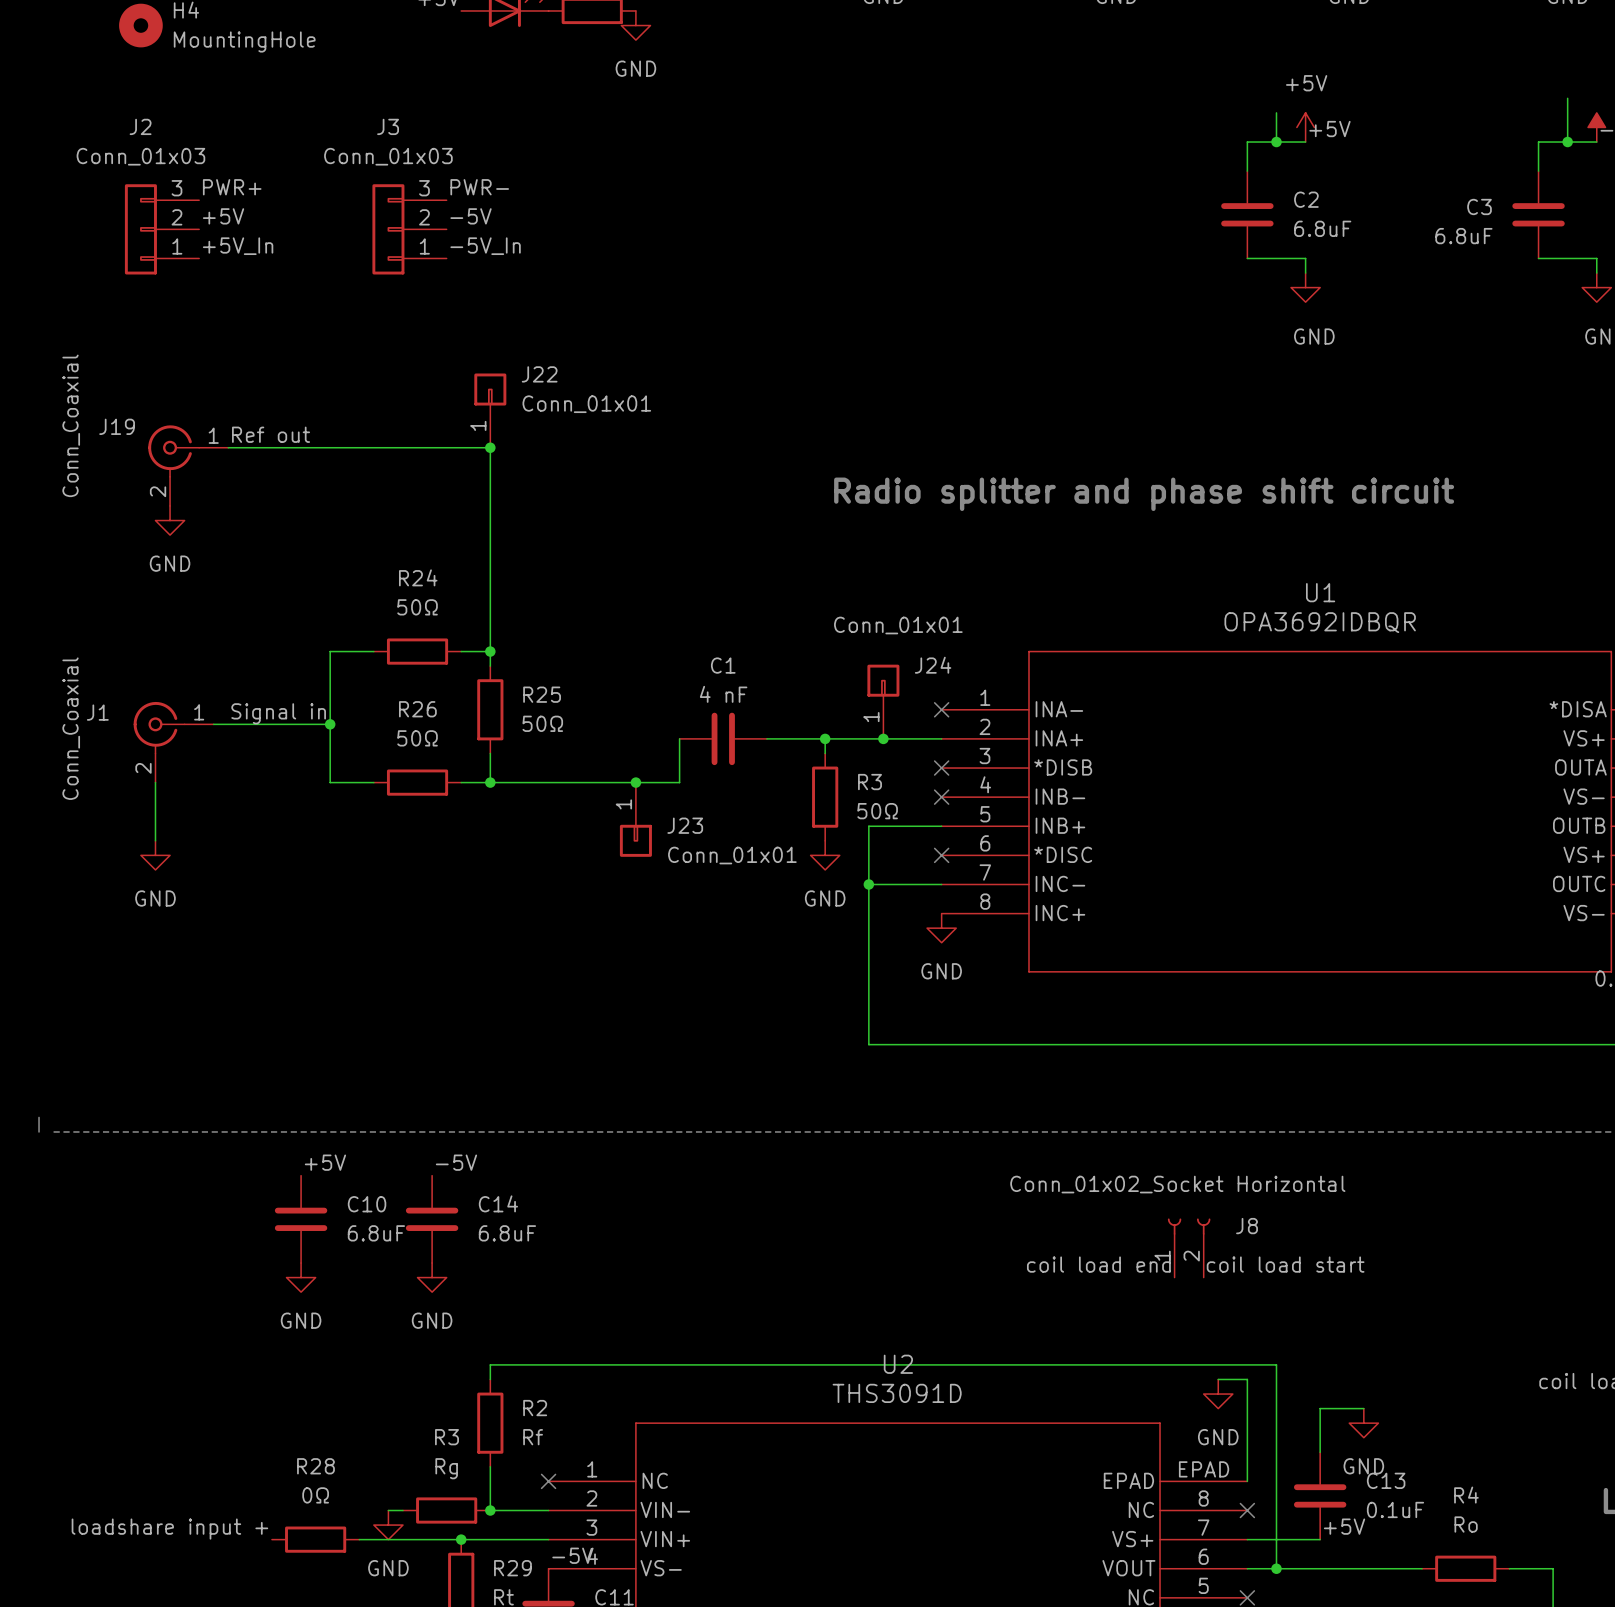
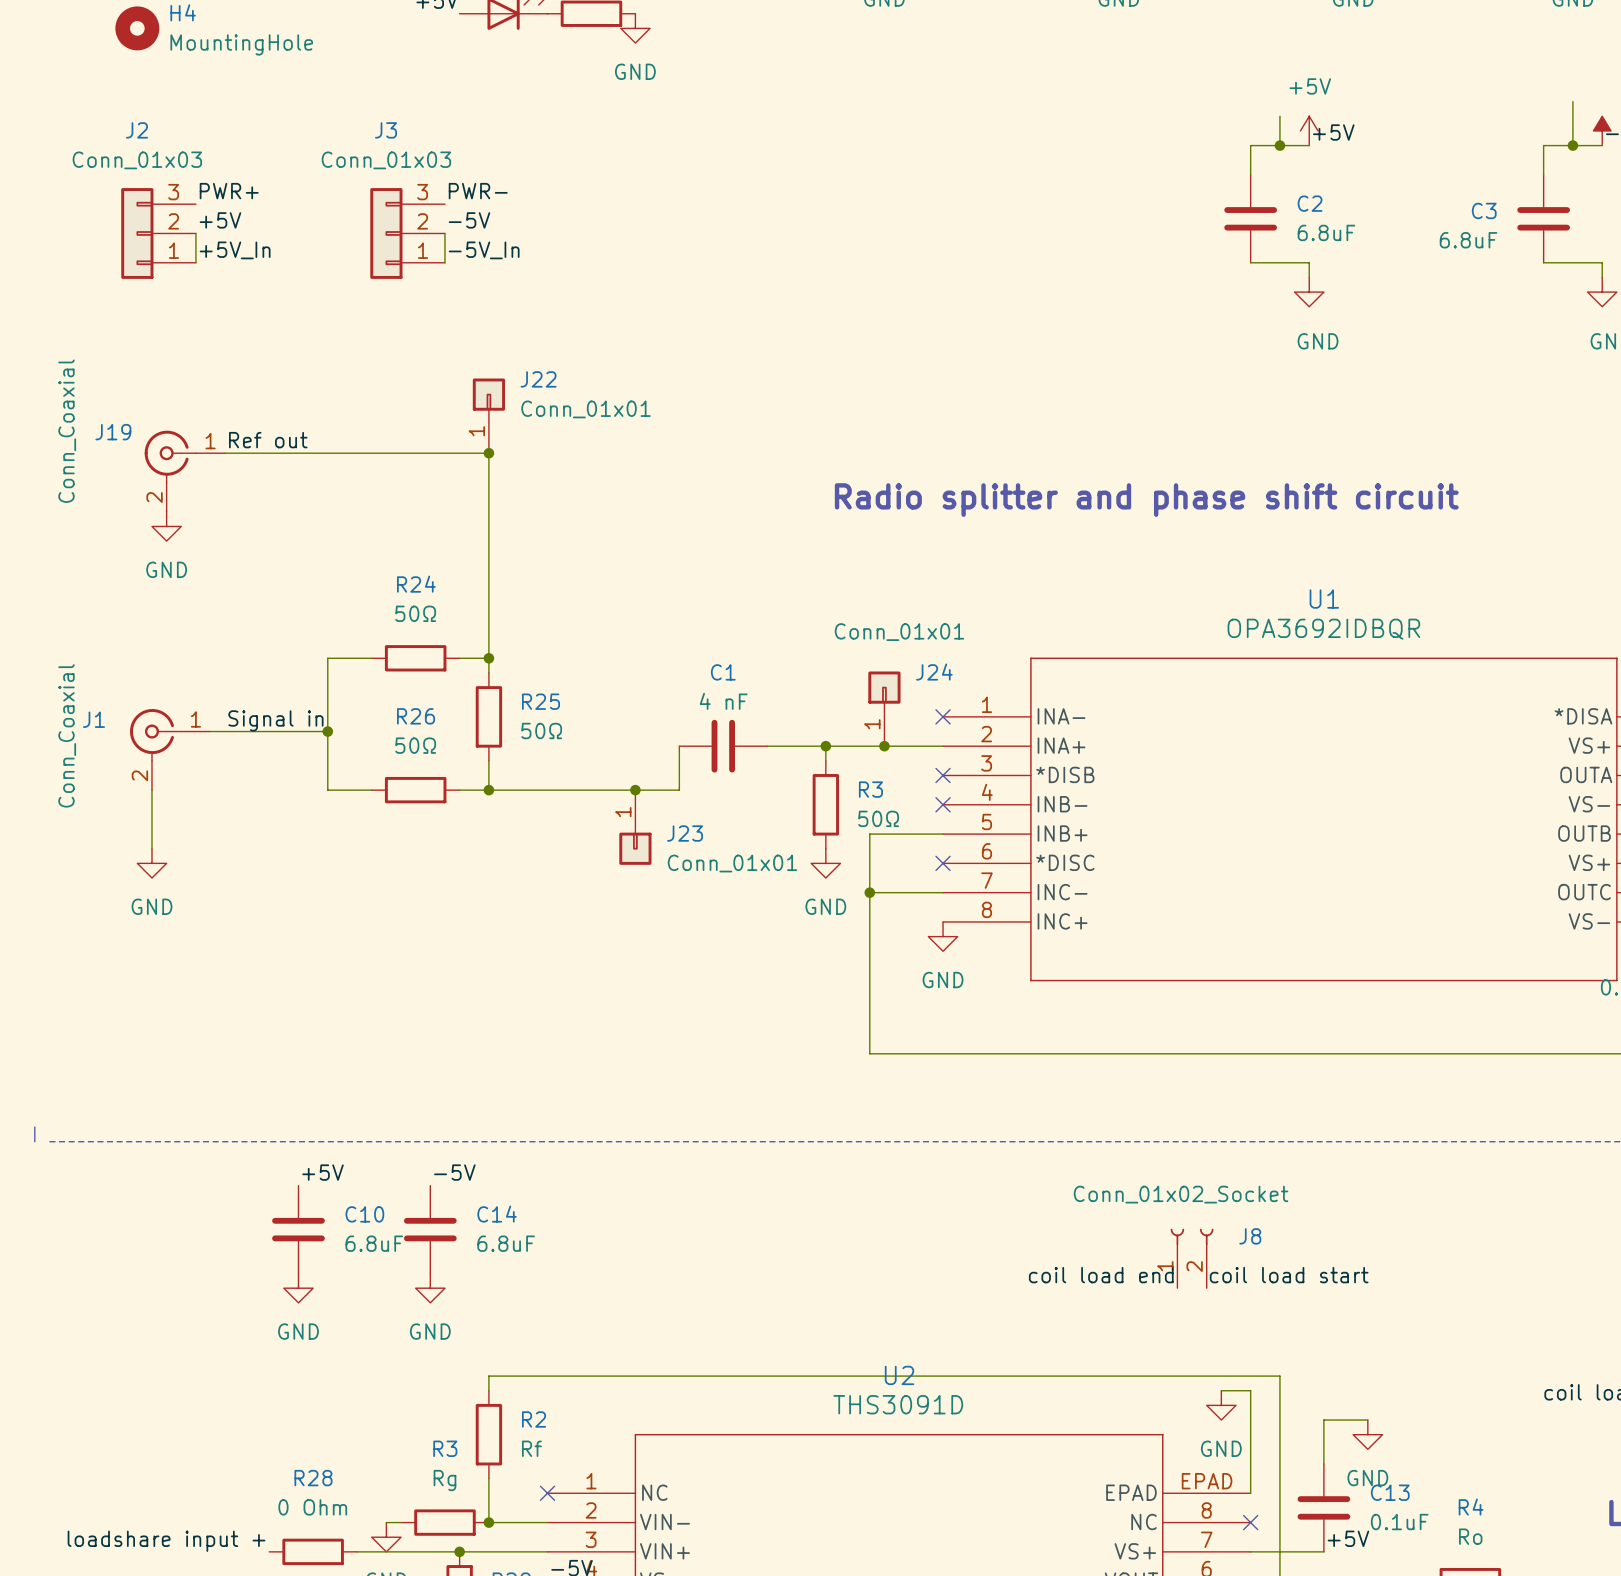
wire: none -> (195, 233) (195, 262)
wire: none -> (444, 233) (444, 262)
J8 value: Conn_01x02_Socket Horizontal (1177, 1184) -> Conn_01x02_Socket (1181, 1194)
R28 value: 0Ω (315, 1495) -> 0 Ohm (312, 1507)

